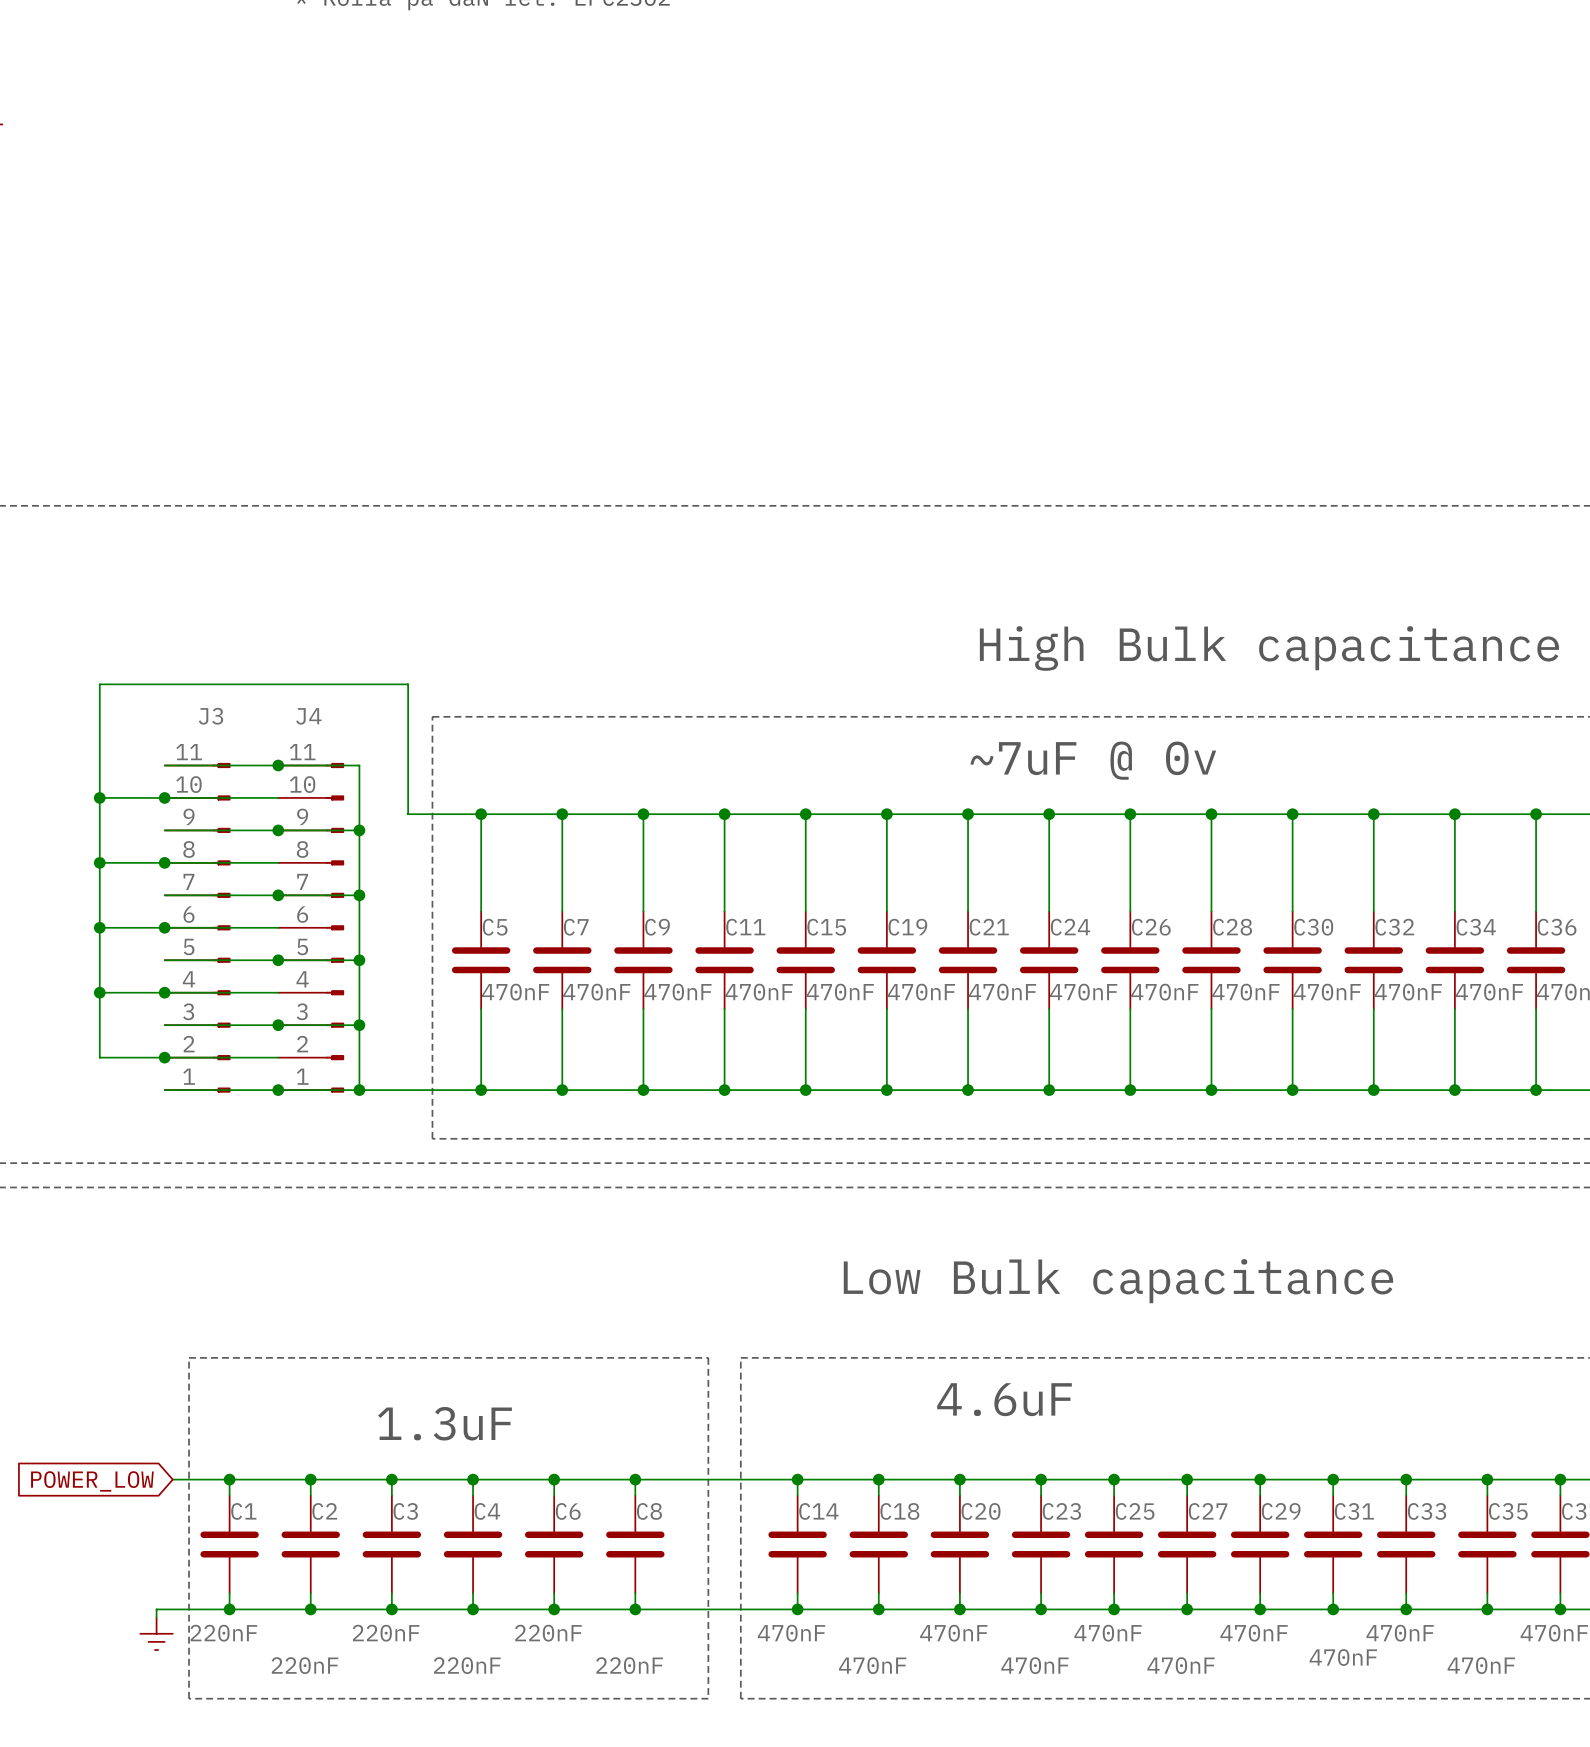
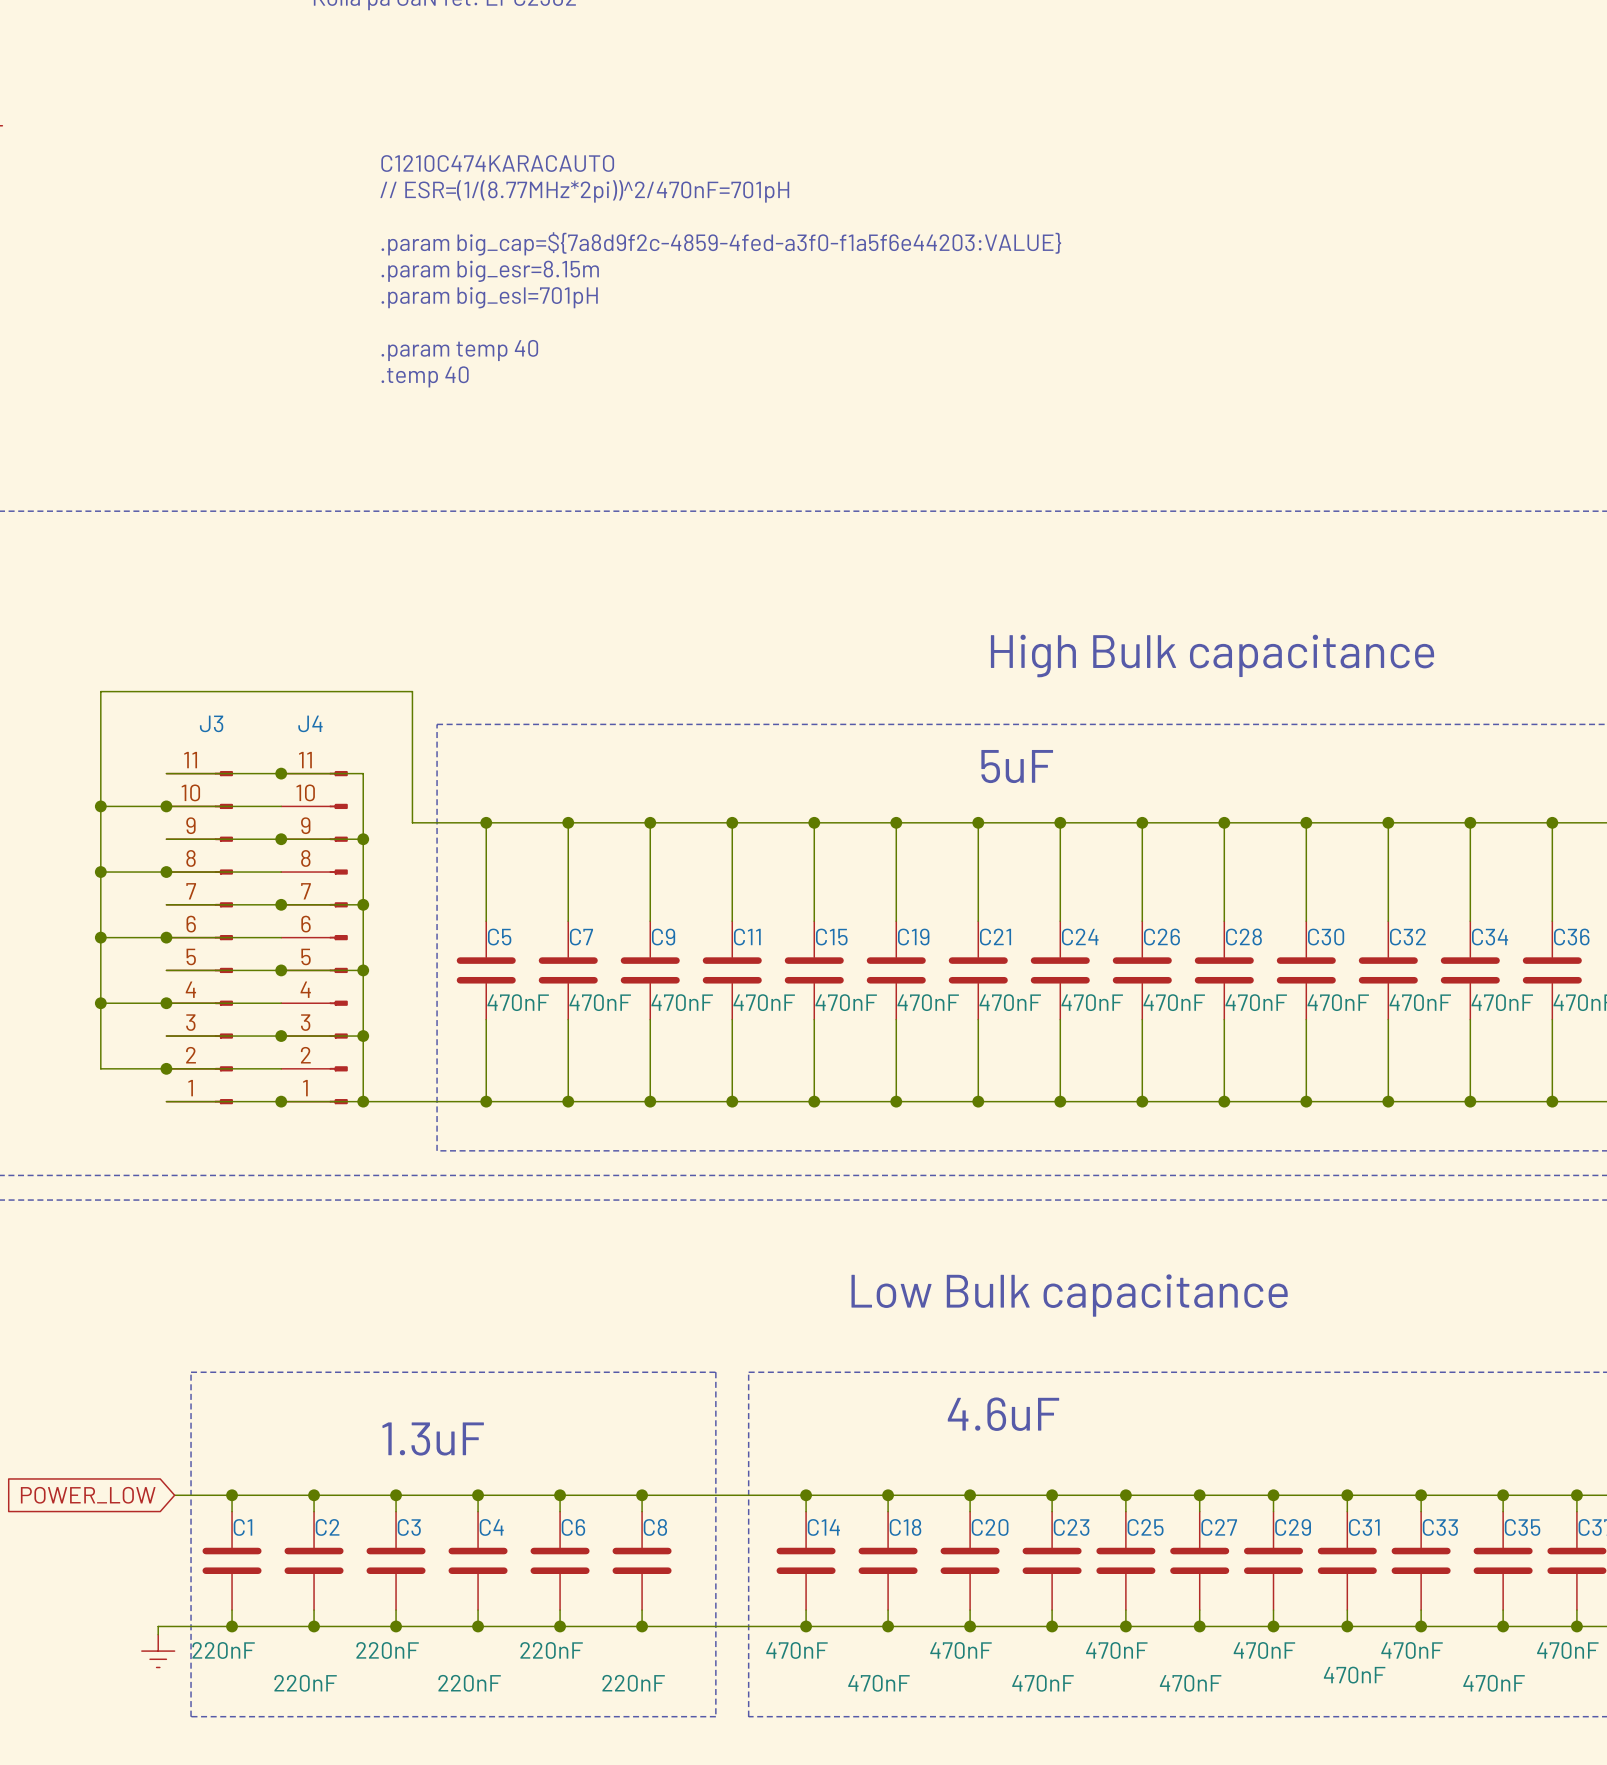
text: none -> C1210C474KARACAUTO (497, 163)
text: none -> // ESR=(1/(8.77MHz*2pi))^2/470nF=701pH (584, 191)
text: none -> .param big_cap=${7a8d9f2c-4859-4fed-a3f0-f1a5f6e44203:VALUE} (721, 243)
text: none -> .param big_esr=8.15m (490, 271)
text: none -> .param big_esl=701pH (489, 297)
text: none -> .param temp 40 (459, 350)
text: none -> .temp 40 (425, 376)
text: ~7uF @ 0v (1093, 760) -> 5uF (1017, 766)

